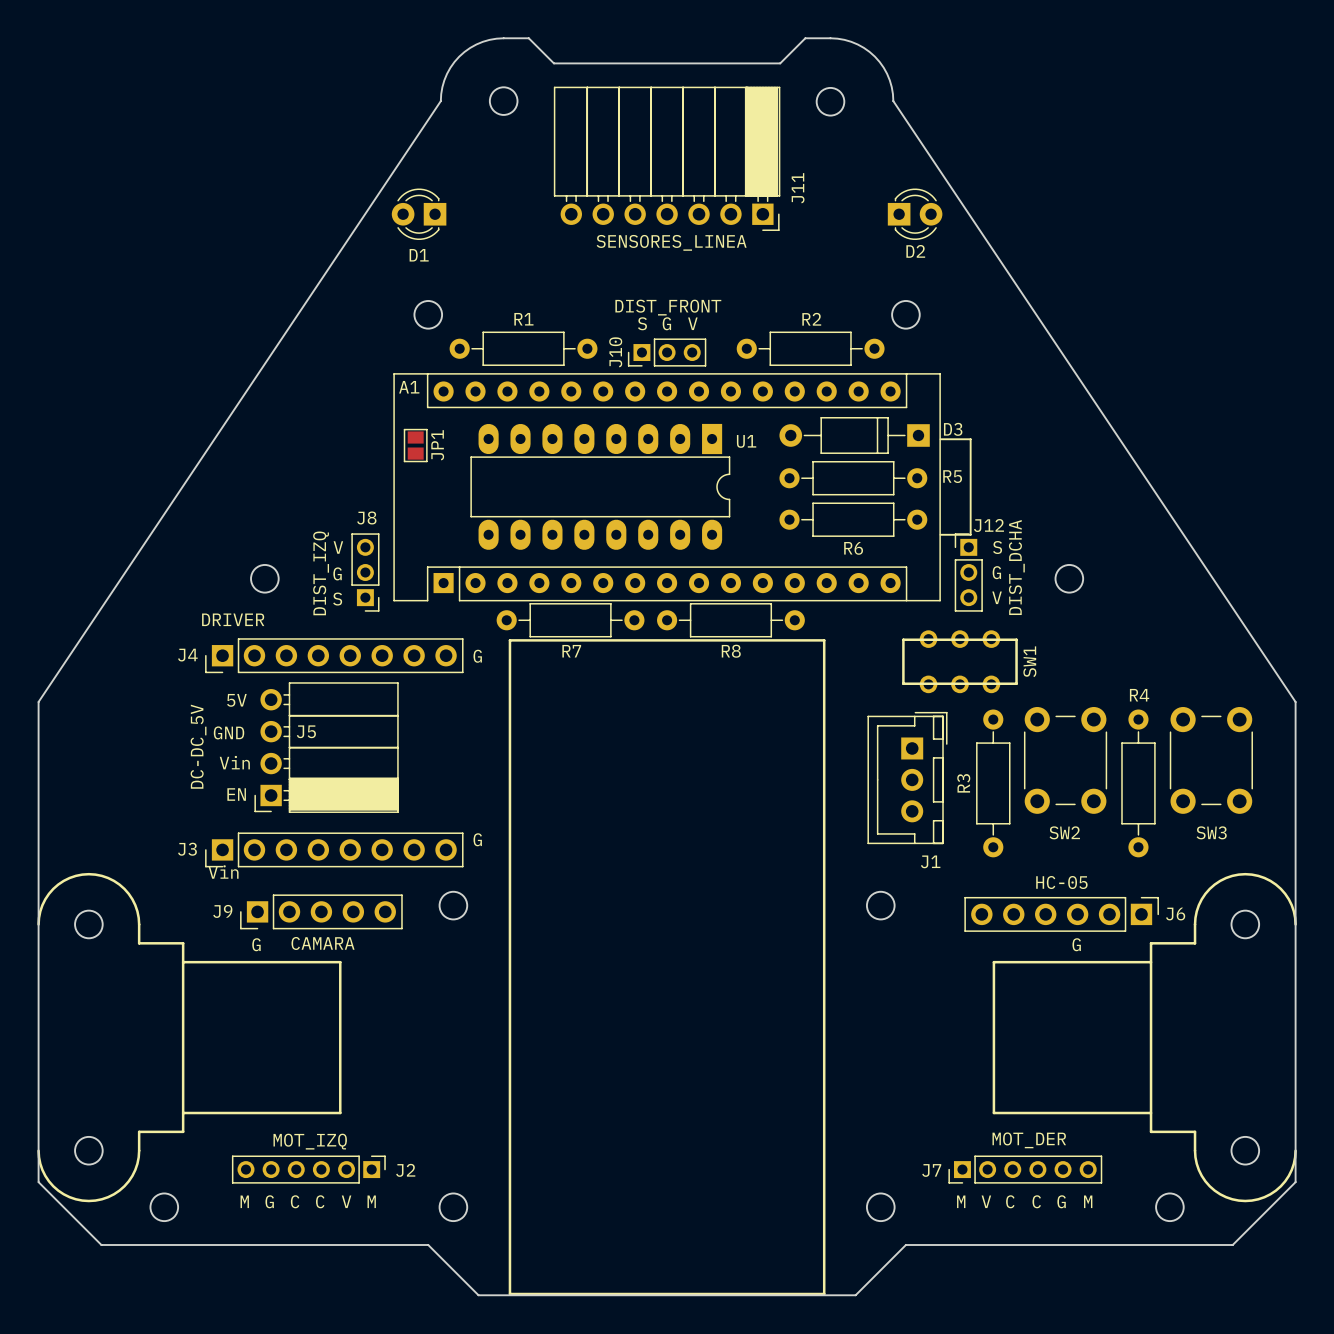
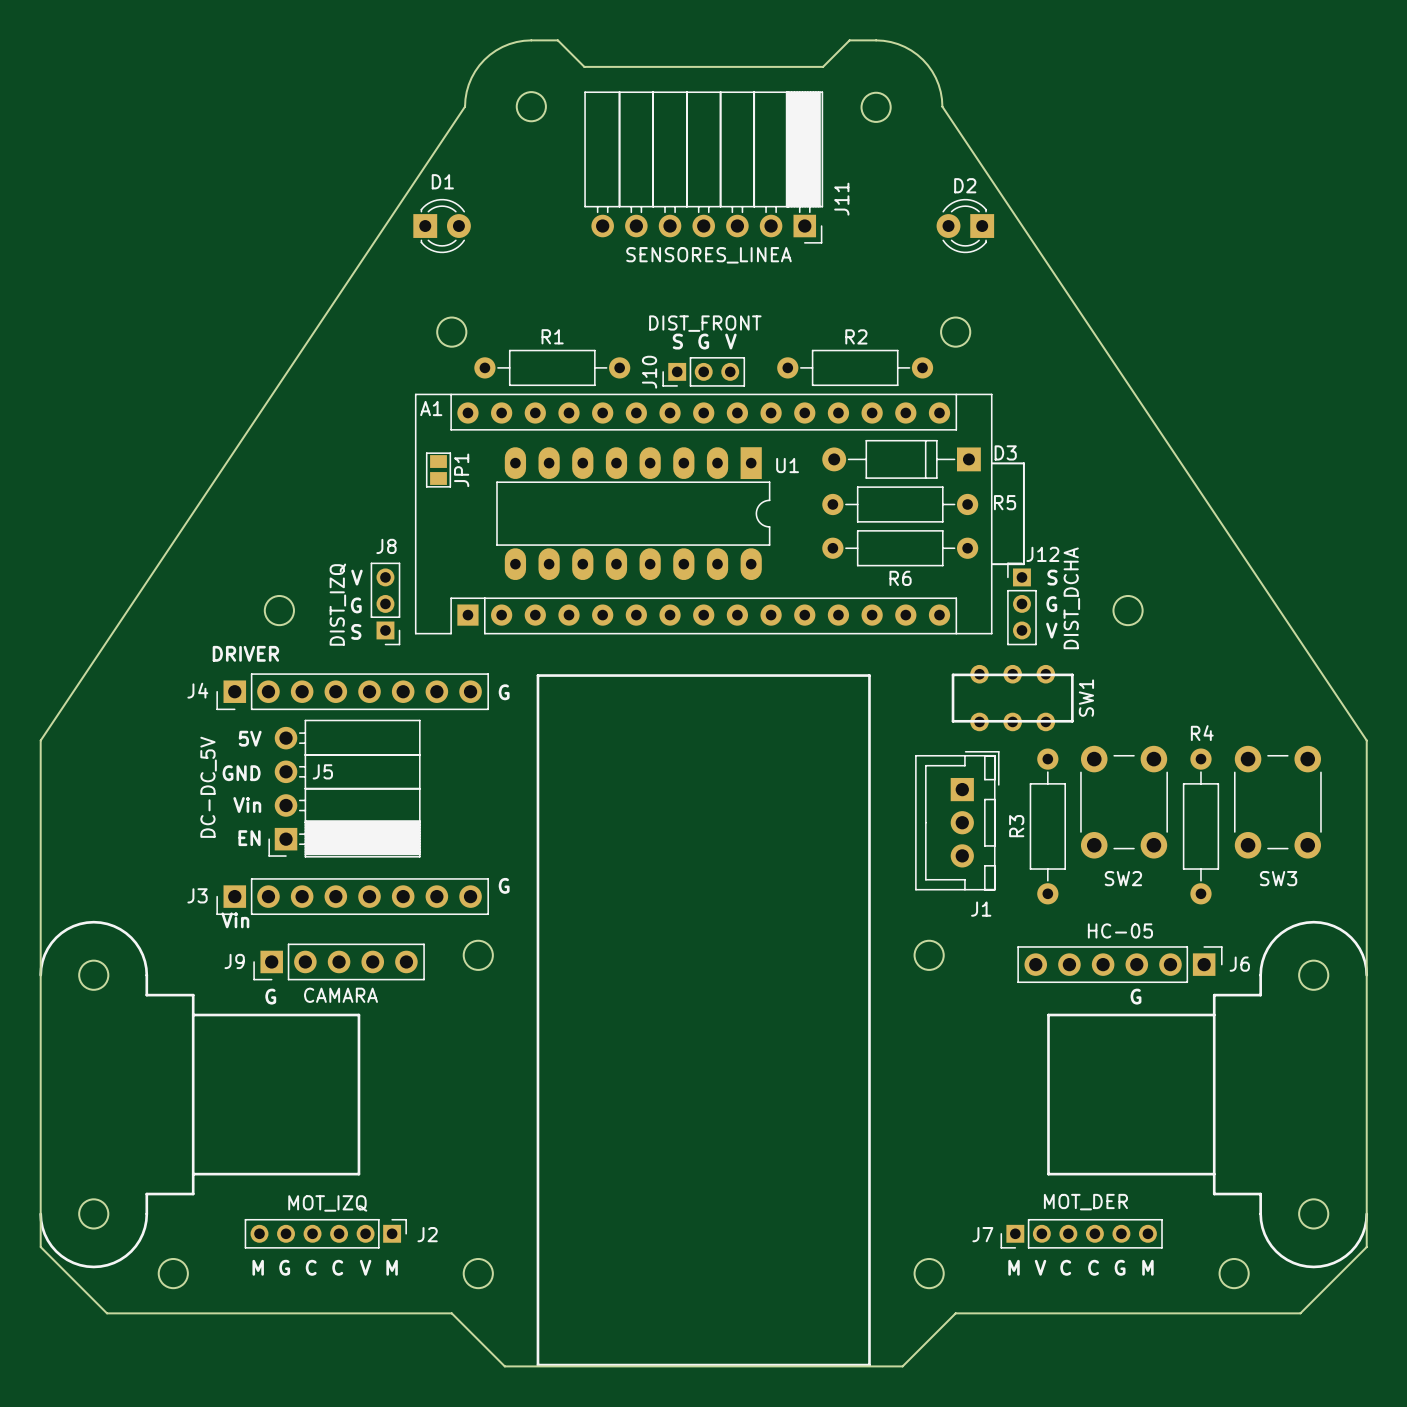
D1 rotation: 0° (419, 214) -> 180° (442, 226)
D2 rotation: 0° (915, 214) -> 180° (965, 226)
R7: (570, 620) -> none
R8: (730, 620) -> none

